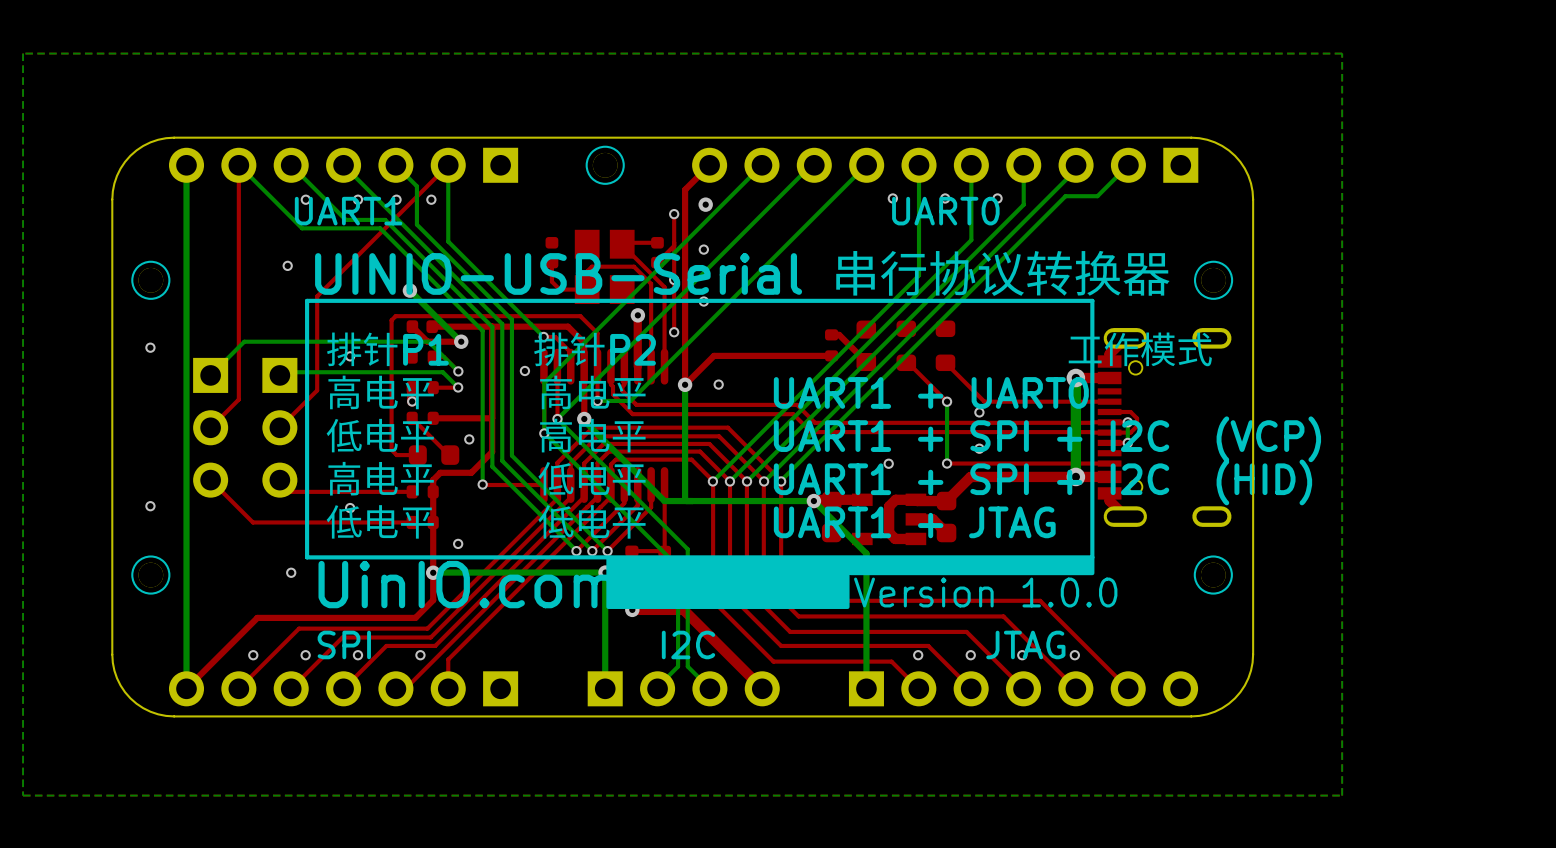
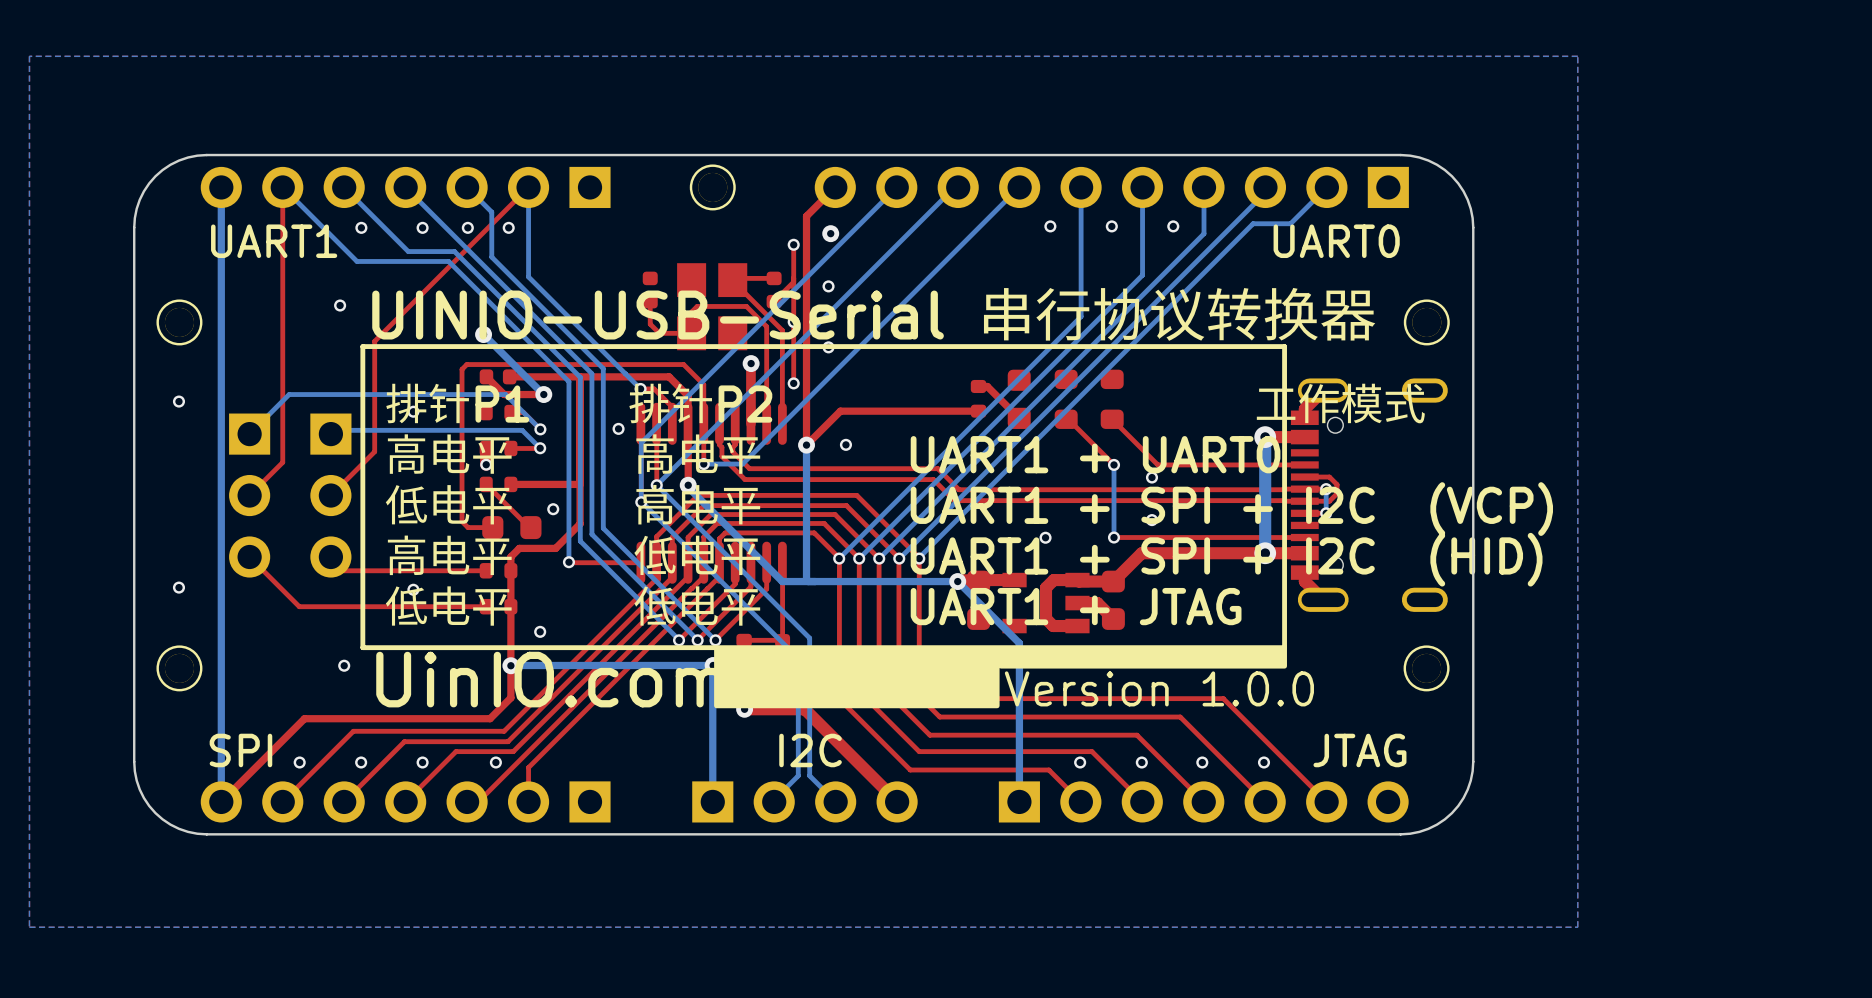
text position: UART1 (348, 211) -> UART1 (274, 241)
text position: UART0 (945, 211) -> UART0 (1336, 241)
text position: SPI (344, 644) -> SPI (240, 750)
text position: JTAG (1025, 644) -> JTAG (1359, 750)

